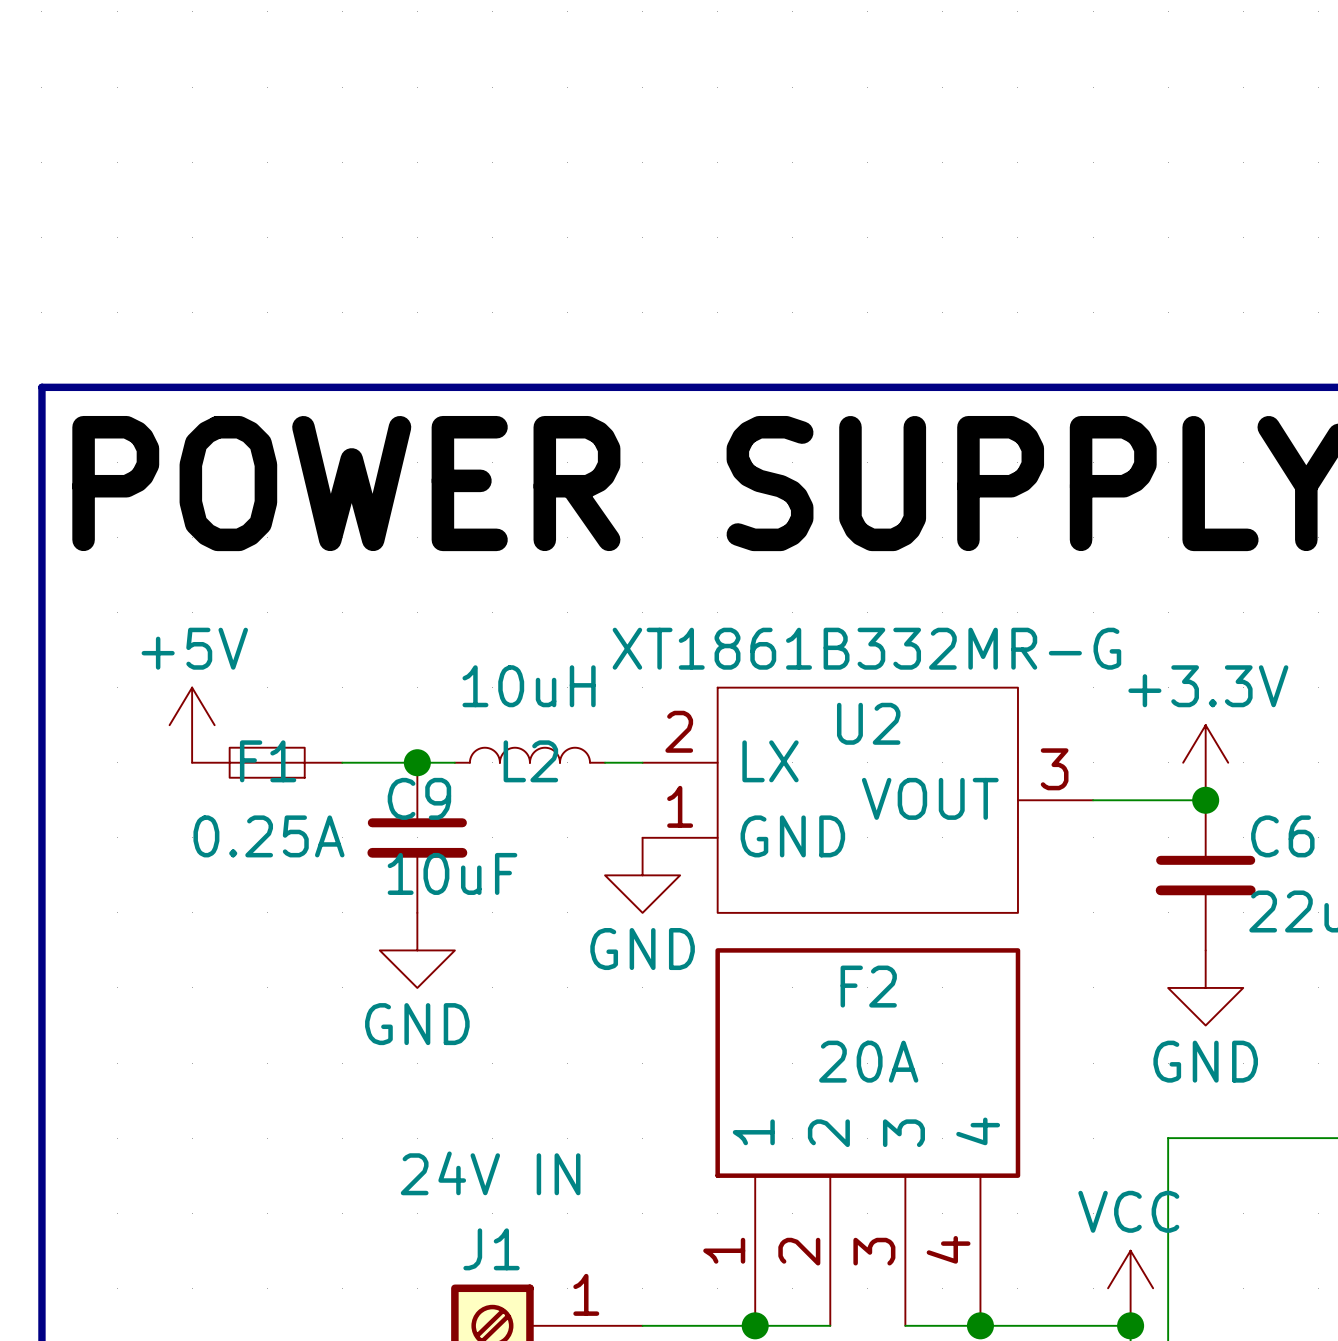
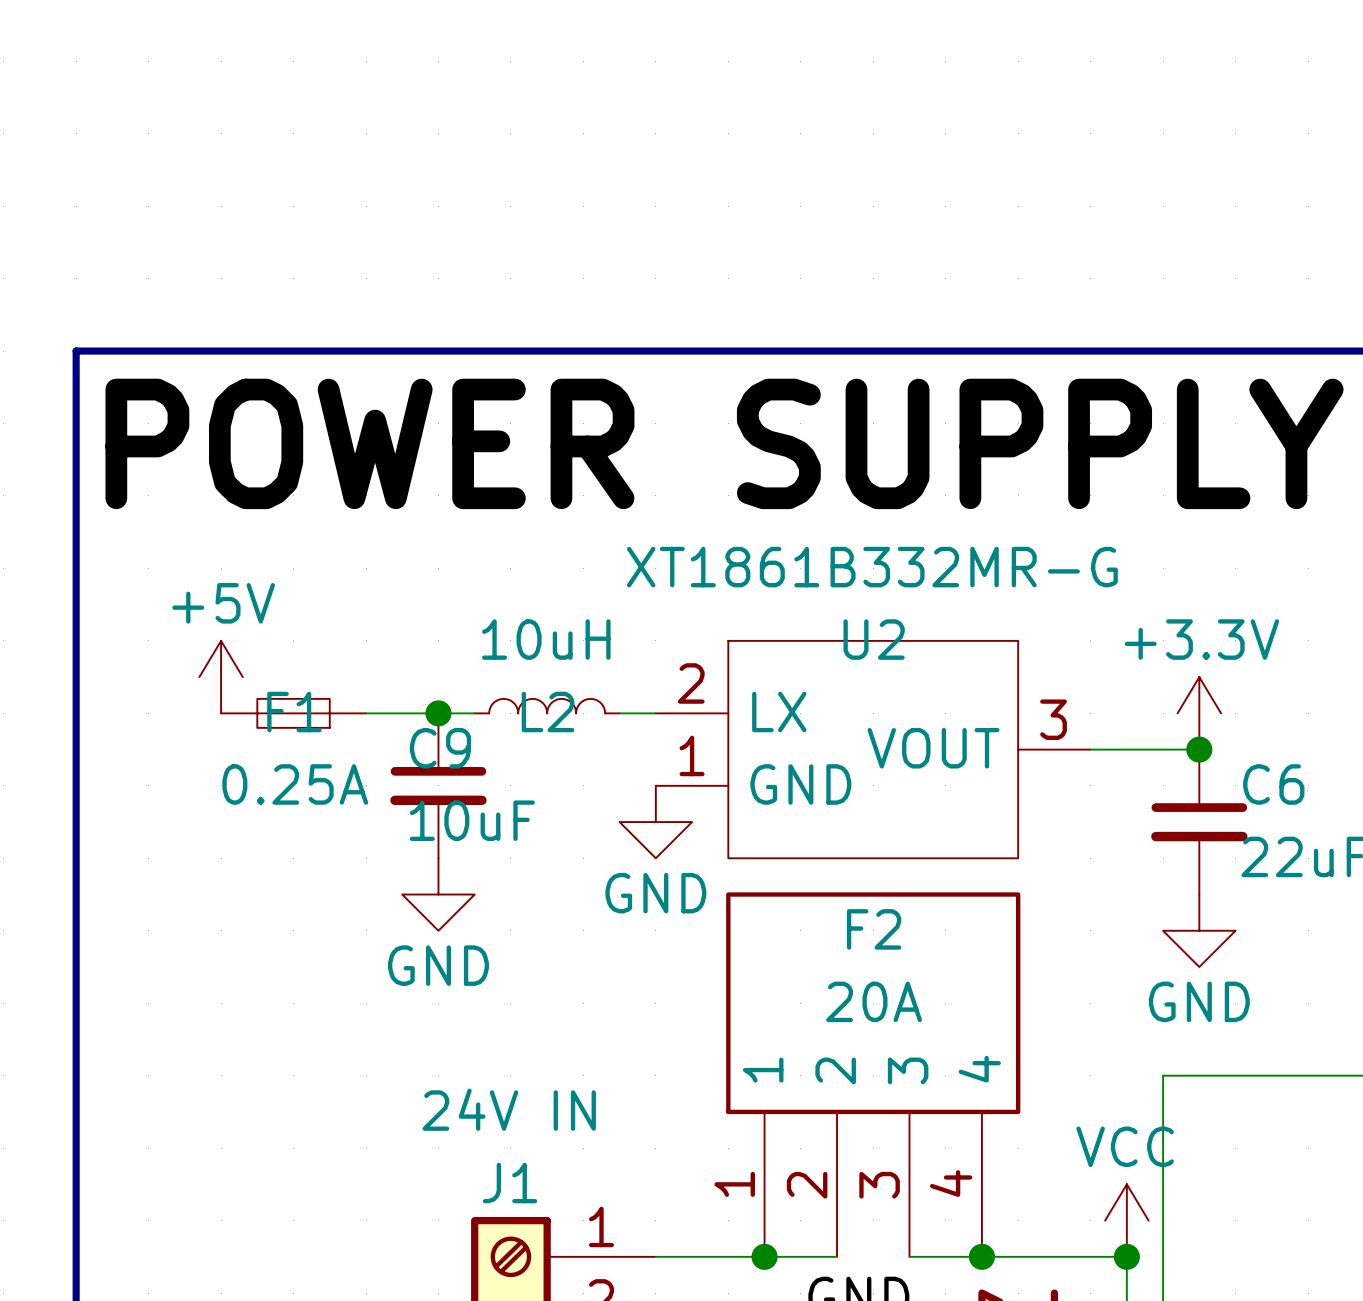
U2 value position: XT1861B332MR-G (866, 648) -> XT1861B332MR-G (872, 567)
U2 name position: U2 (868, 723) -> U2 (874, 639)

